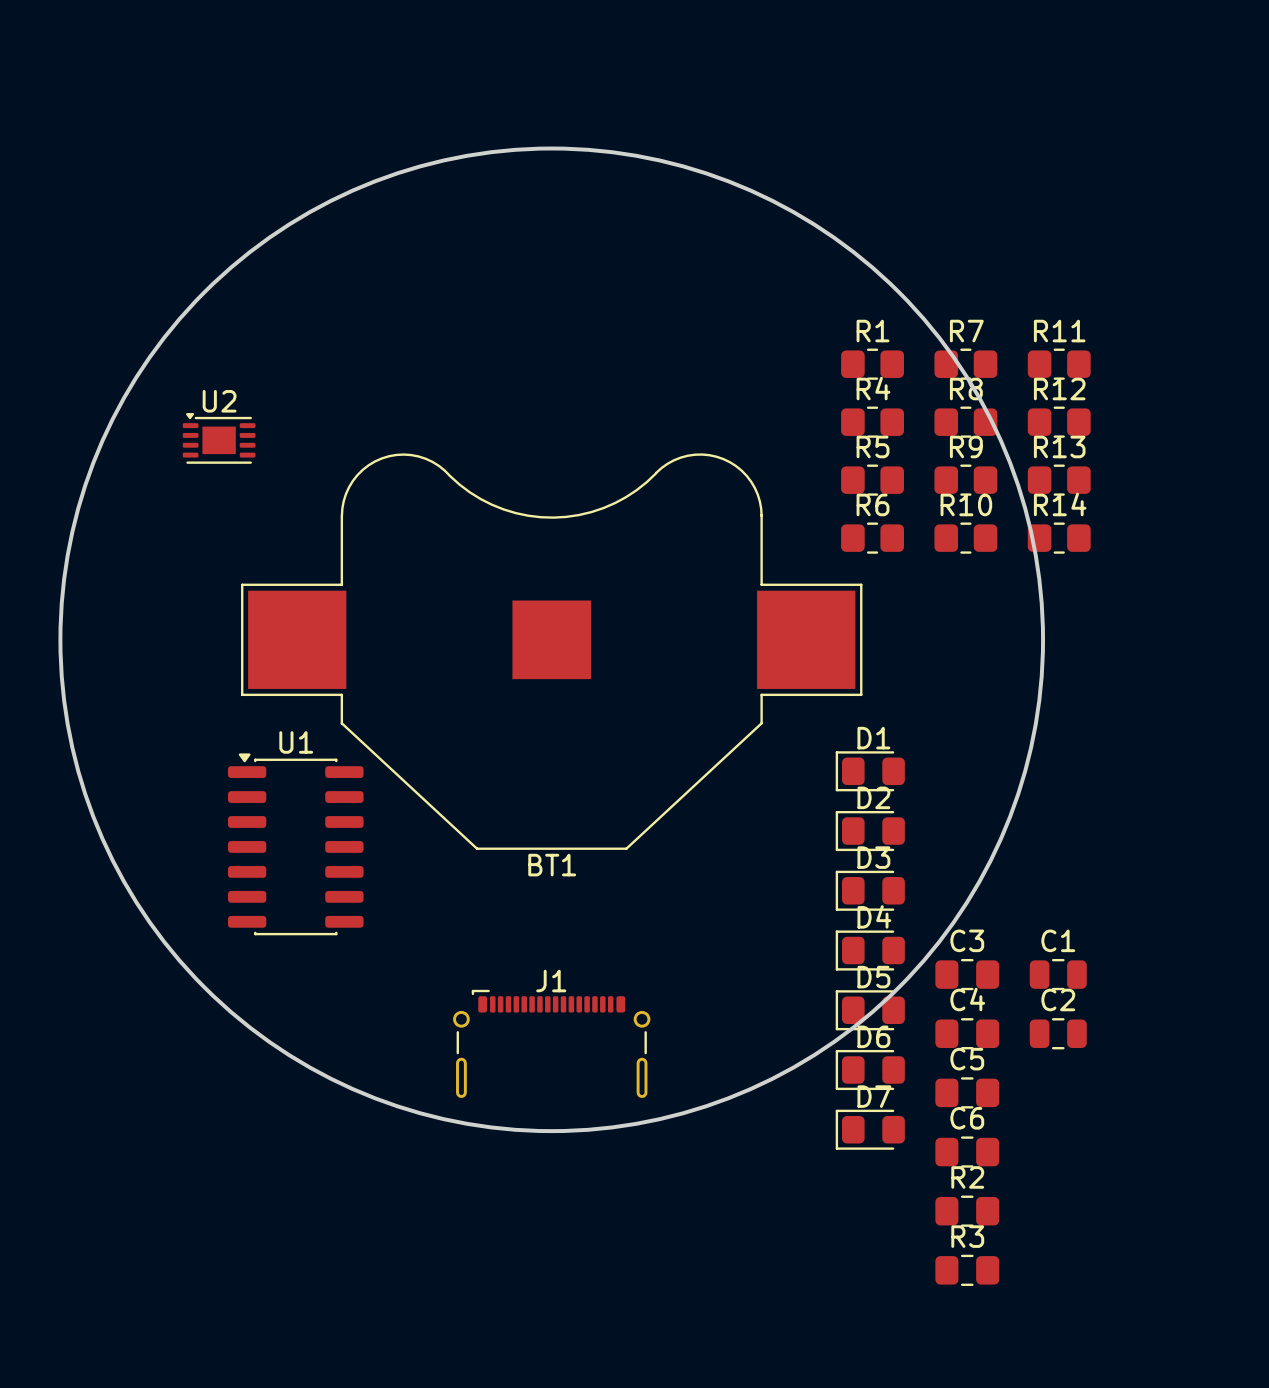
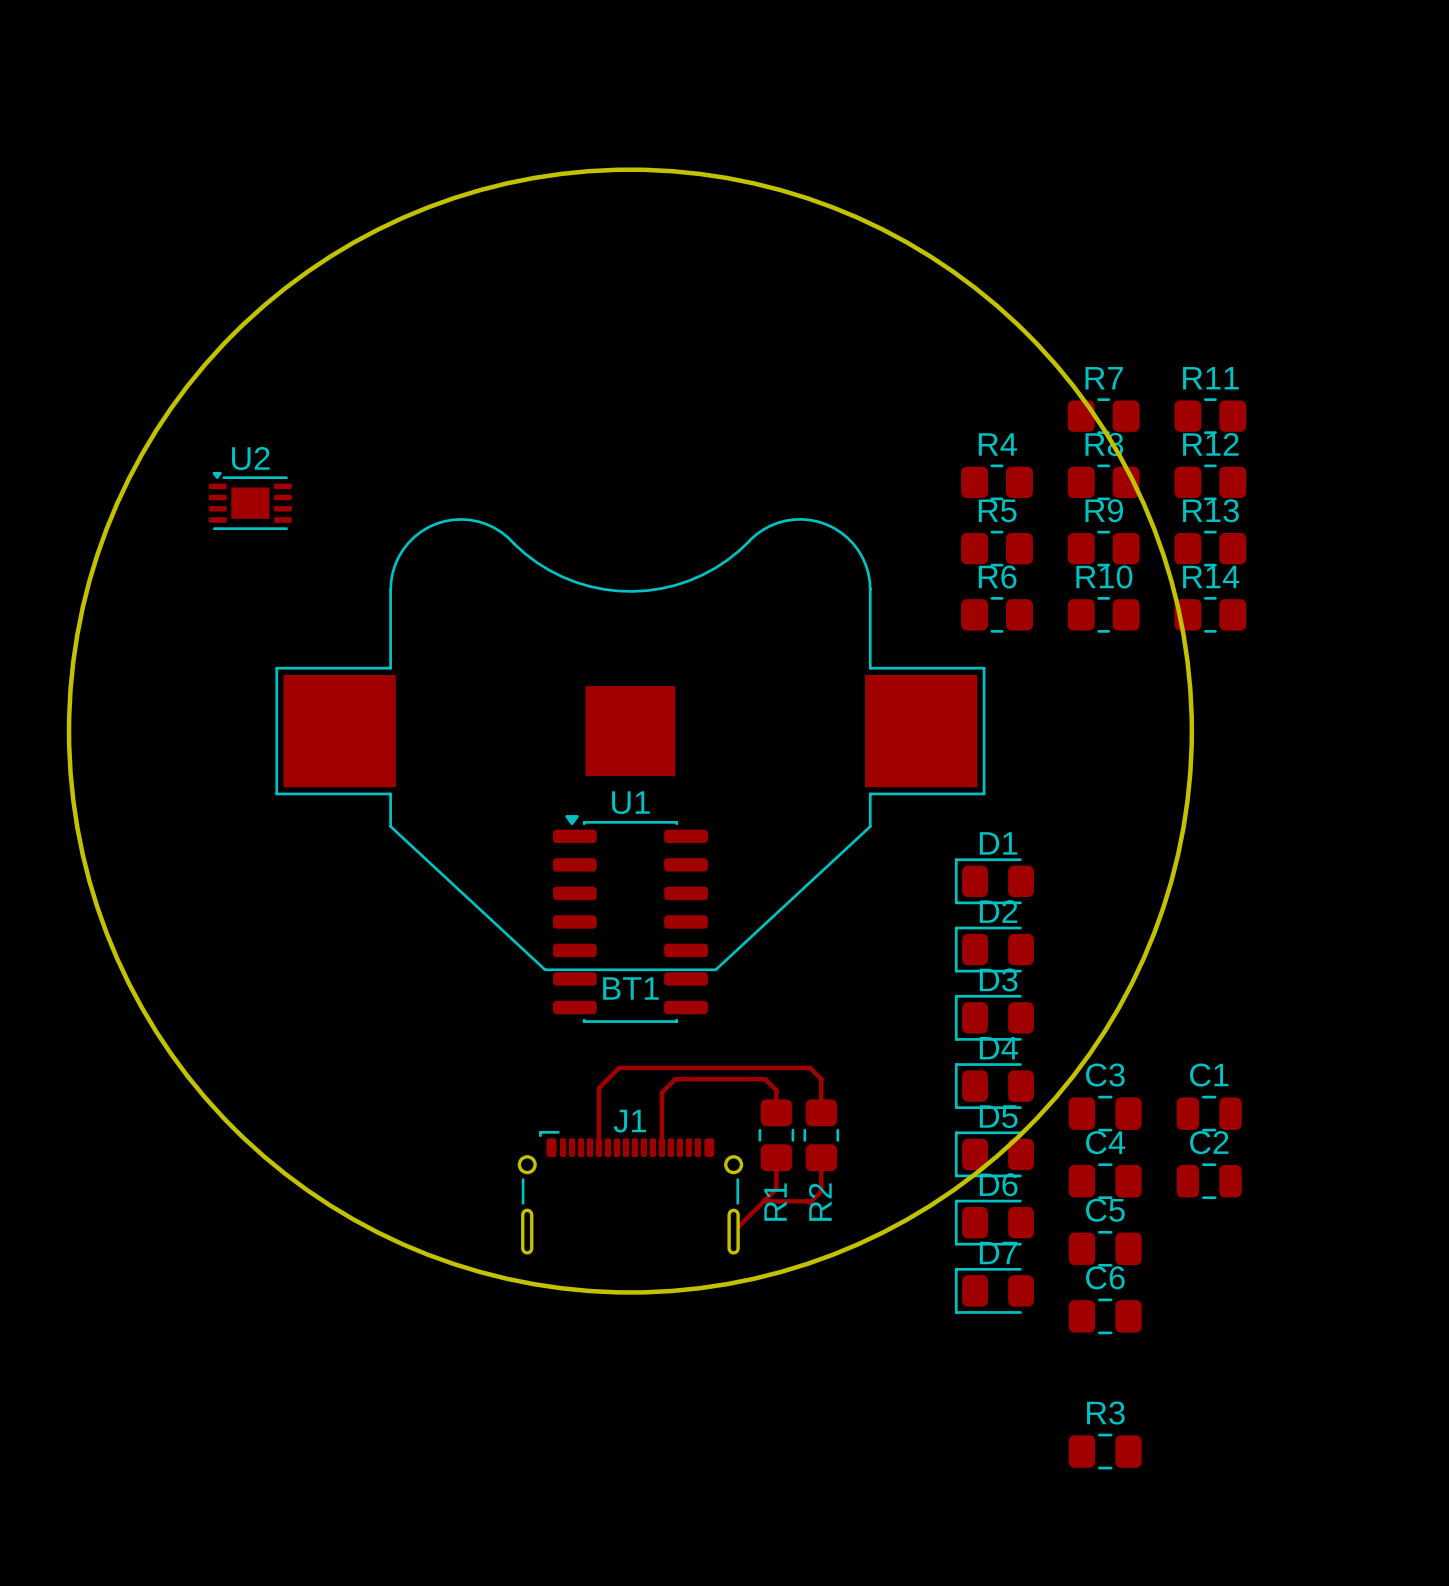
R1 name position: R1 (873, 331) -> R1 (775, 1202)
R1 rotation: 0° (872, 364) -> 90° clockwise (776, 1135)
R1 position: (872, 364) -> (776, 1135)
U1 position: (295, 844) -> (630, 918)
track: none -> (776, 1112) (776, 1090) (765, 1079) (675, 1079) (661, 1092) (661, 1147)
track: none -> (821, 1112) (821, 1079) (810, 1067) (619, 1067) (598, 1088) (598, 1147)
track: none -> (776, 1157) (776, 1188) (733, 1231)
track: none -> (821, 1157) (821, 1191) (810, 1202) (763, 1201)
R2 name position: R2 (967, 1177) -> R2 (820, 1202)
R2 footprint: [935, 1195, 1000, 1227] -> [803, 1099, 840, 1172]

